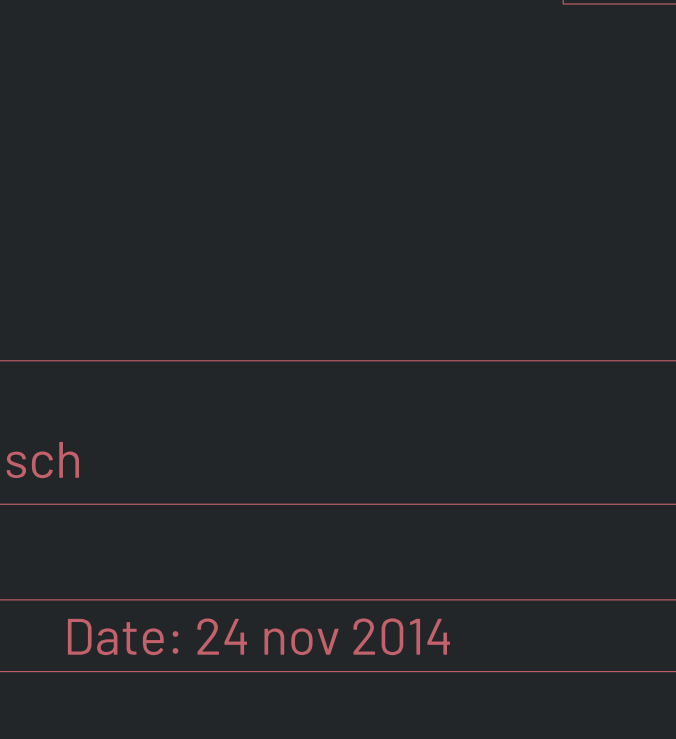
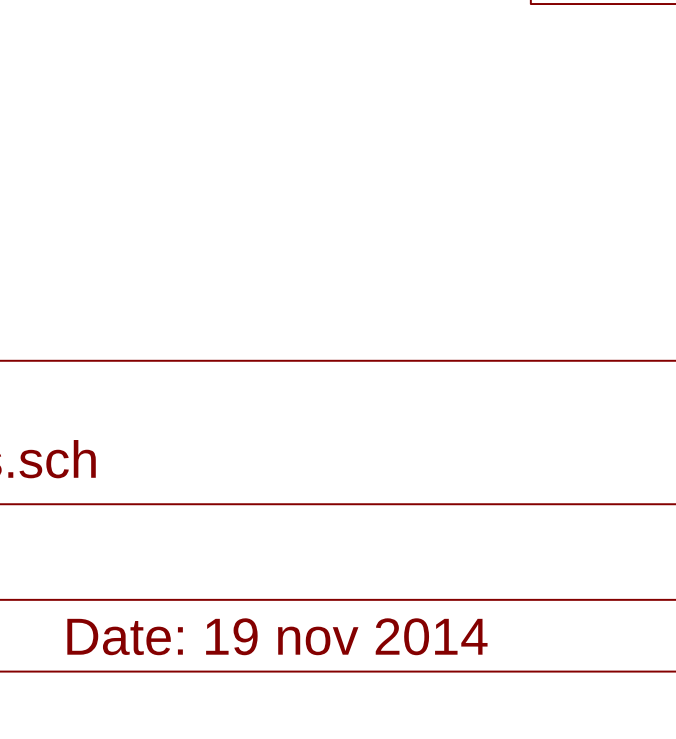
title block: Date: 24 nov 2014 (258, 636) -> Date: 19 nov 2014 (277, 636)

